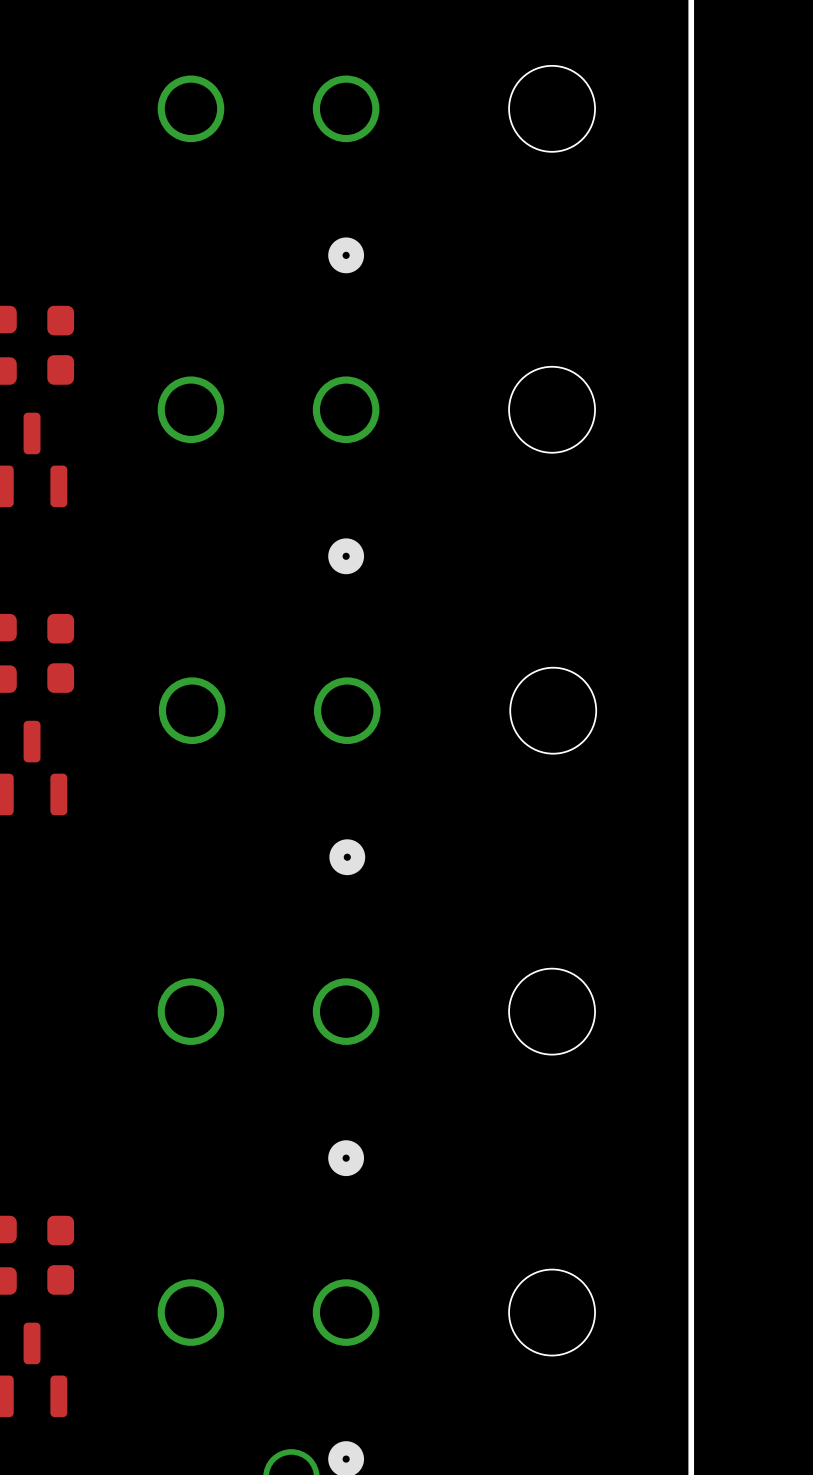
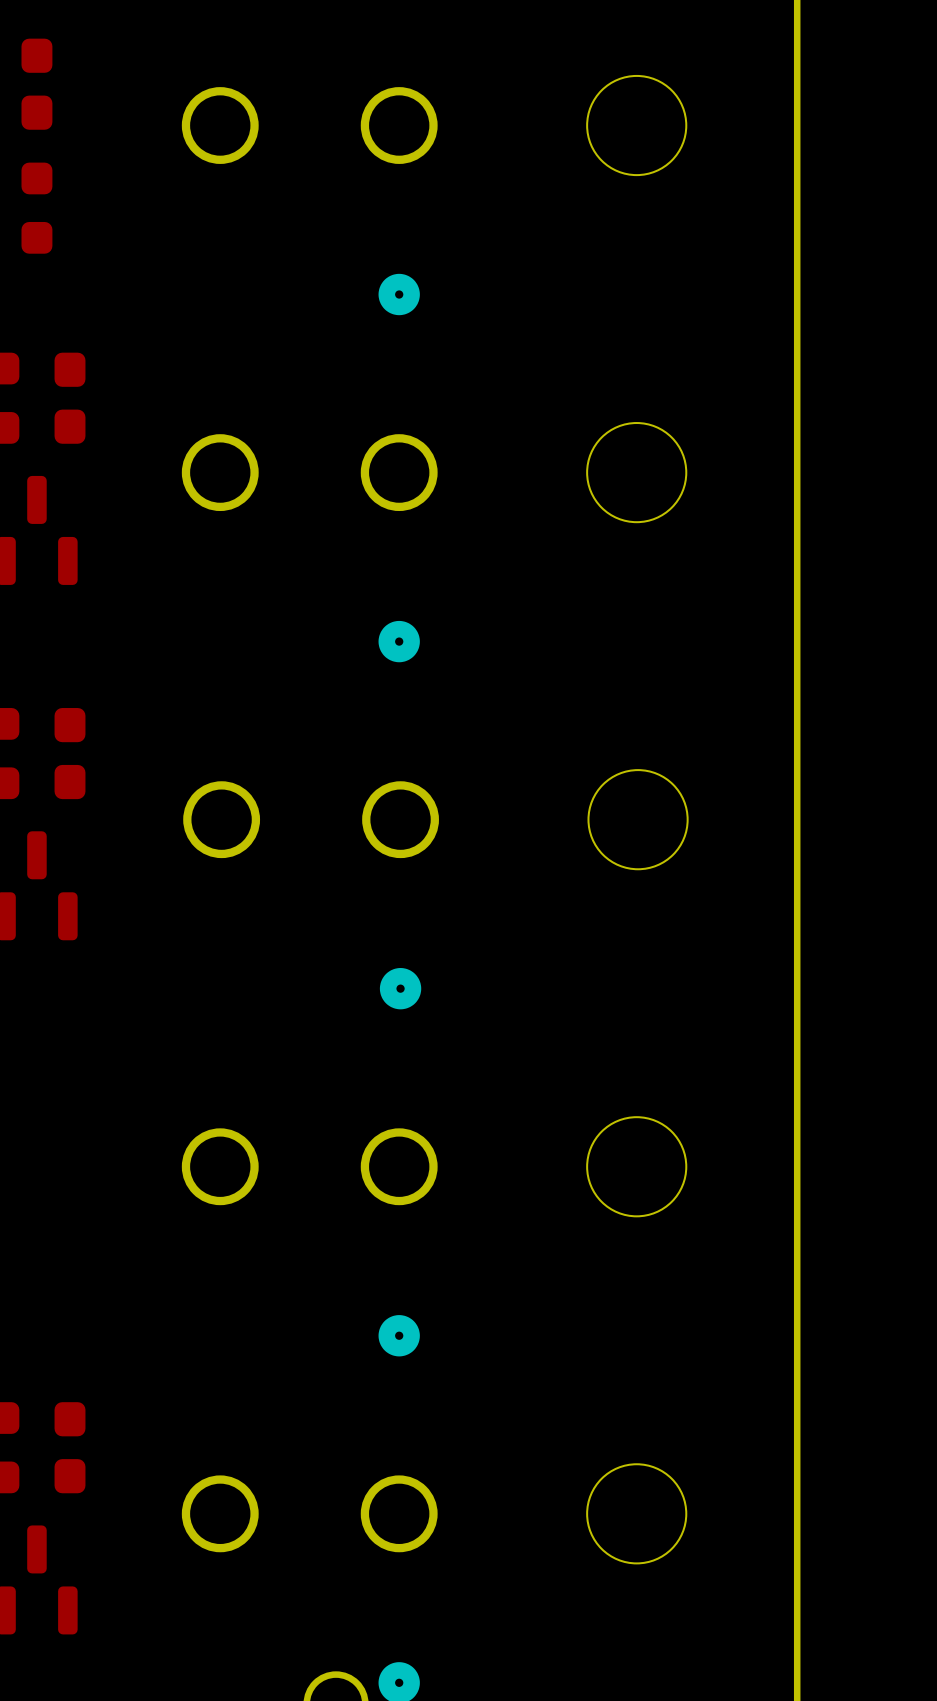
part: none -> (36, 84)
part: none -> (36, 208)

